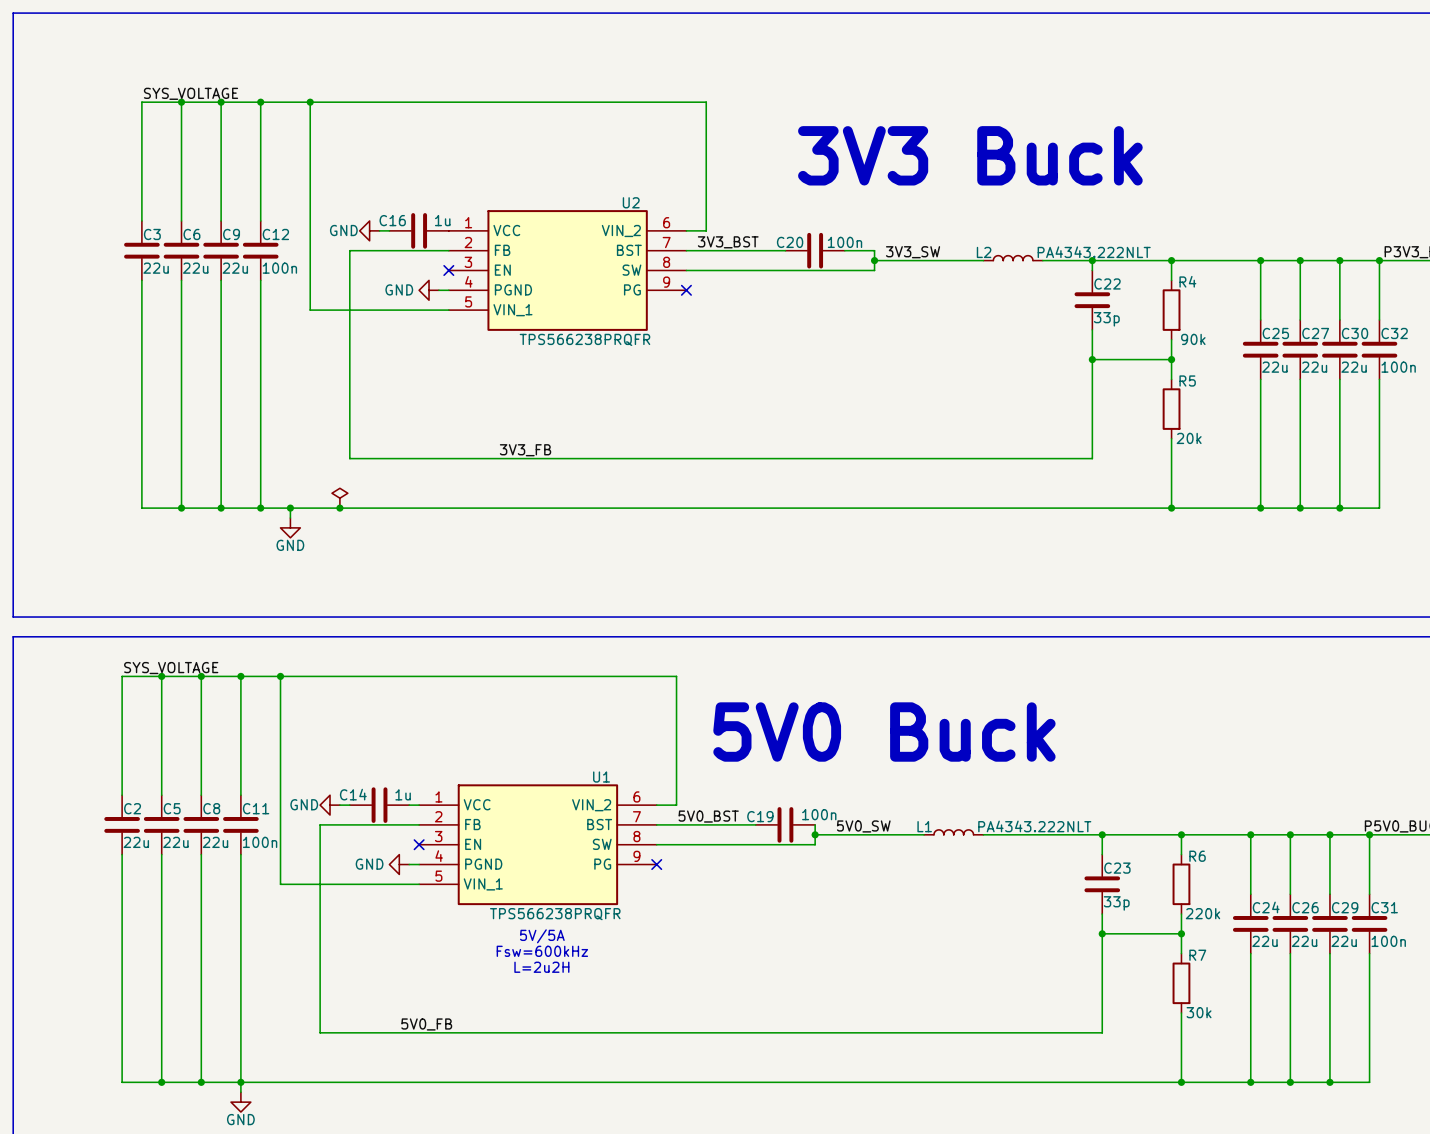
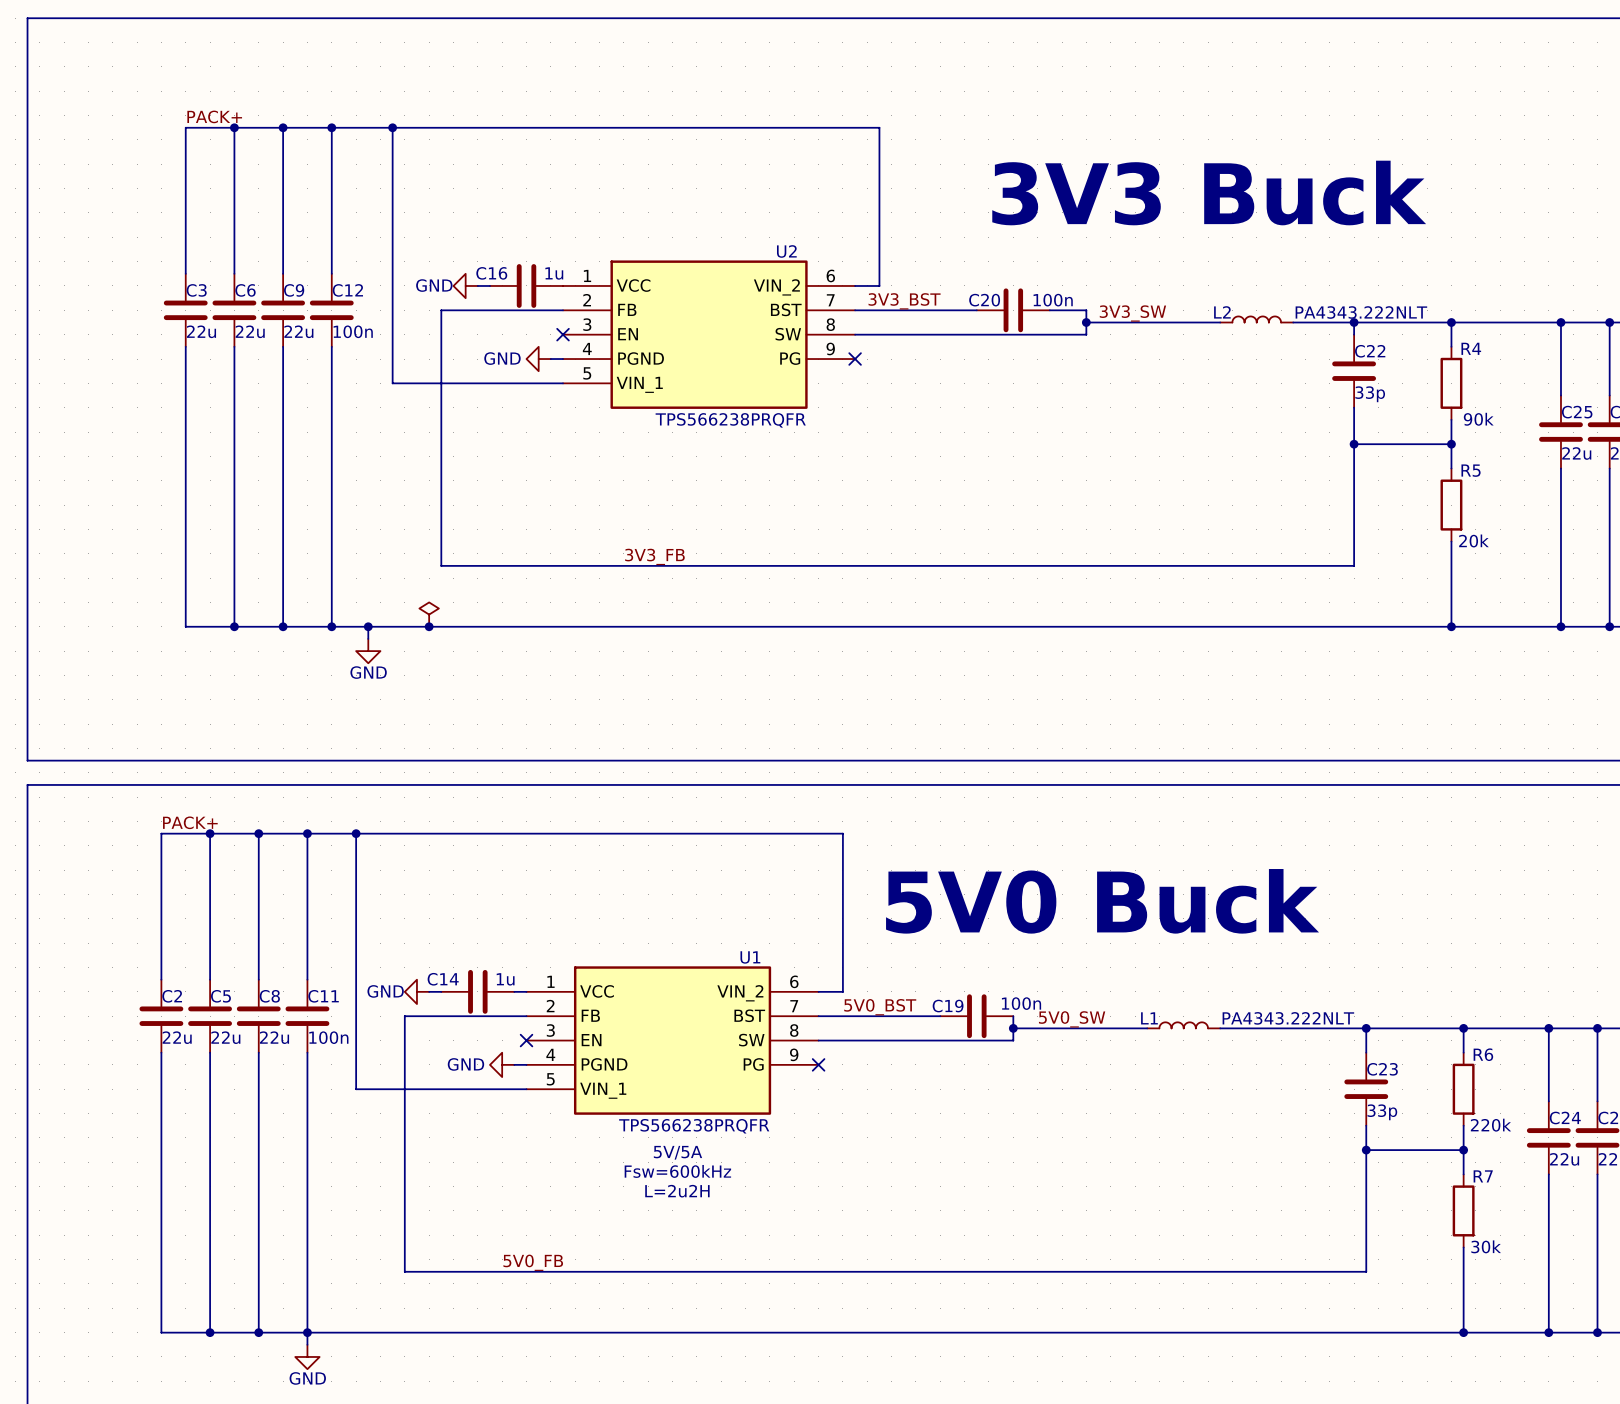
label: SYS_VOLTAGE (191, 93) -> PACK+ (214, 116)
label: SYS_VOLTAGE (171, 668) -> PACK+ (190, 822)

